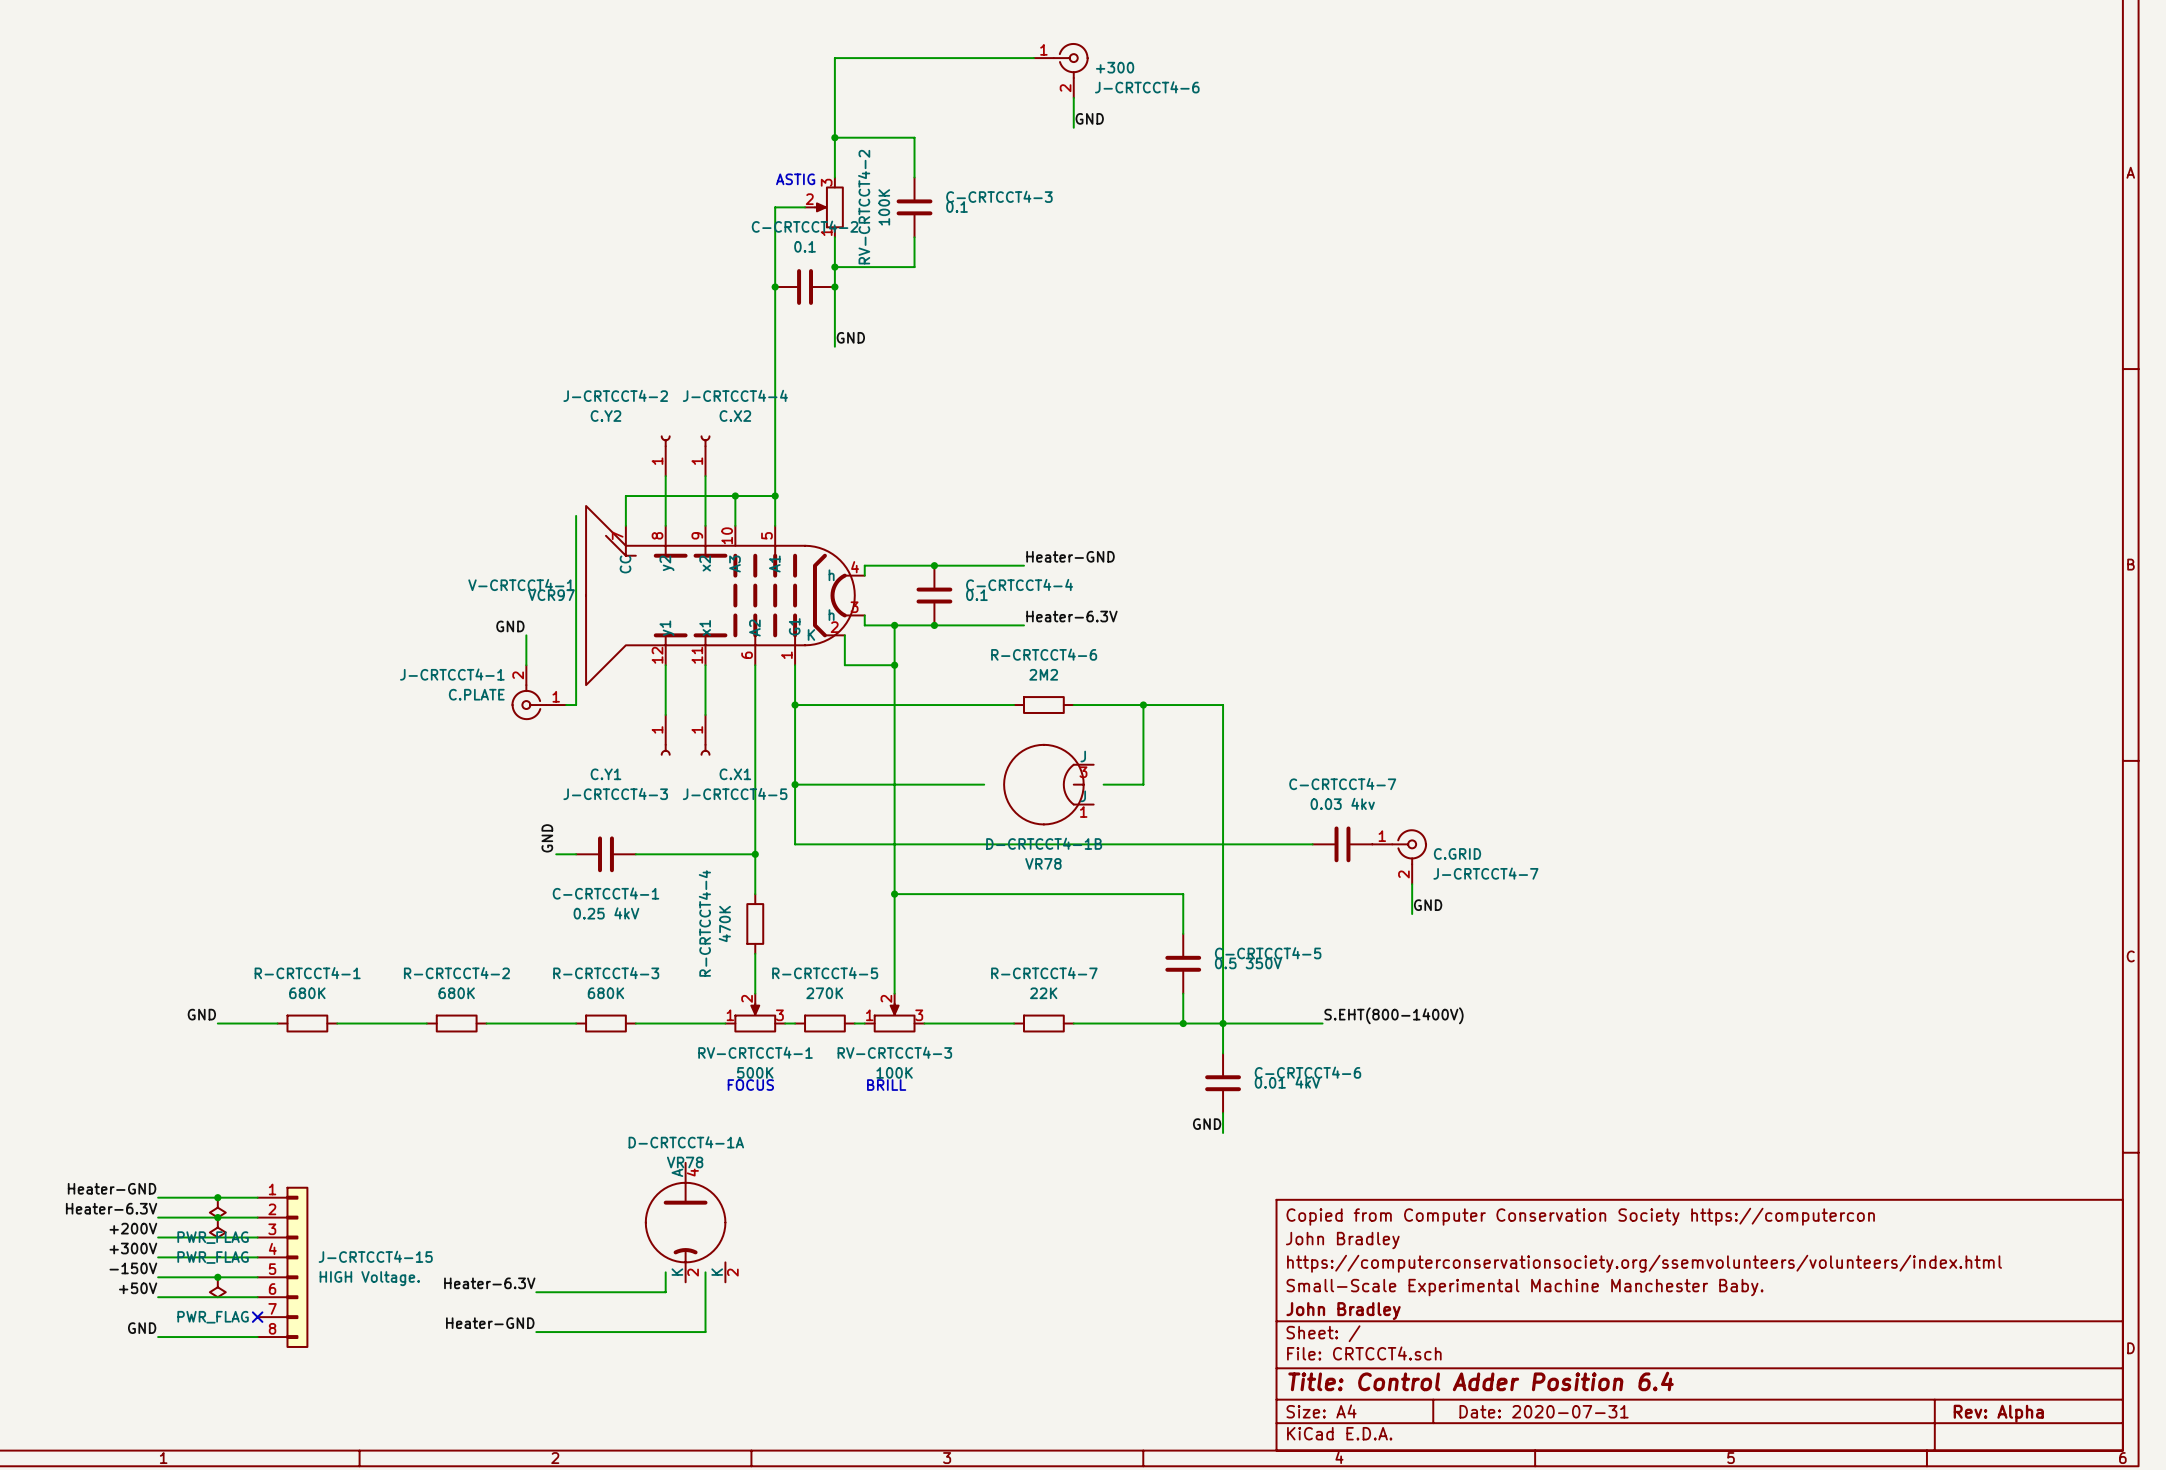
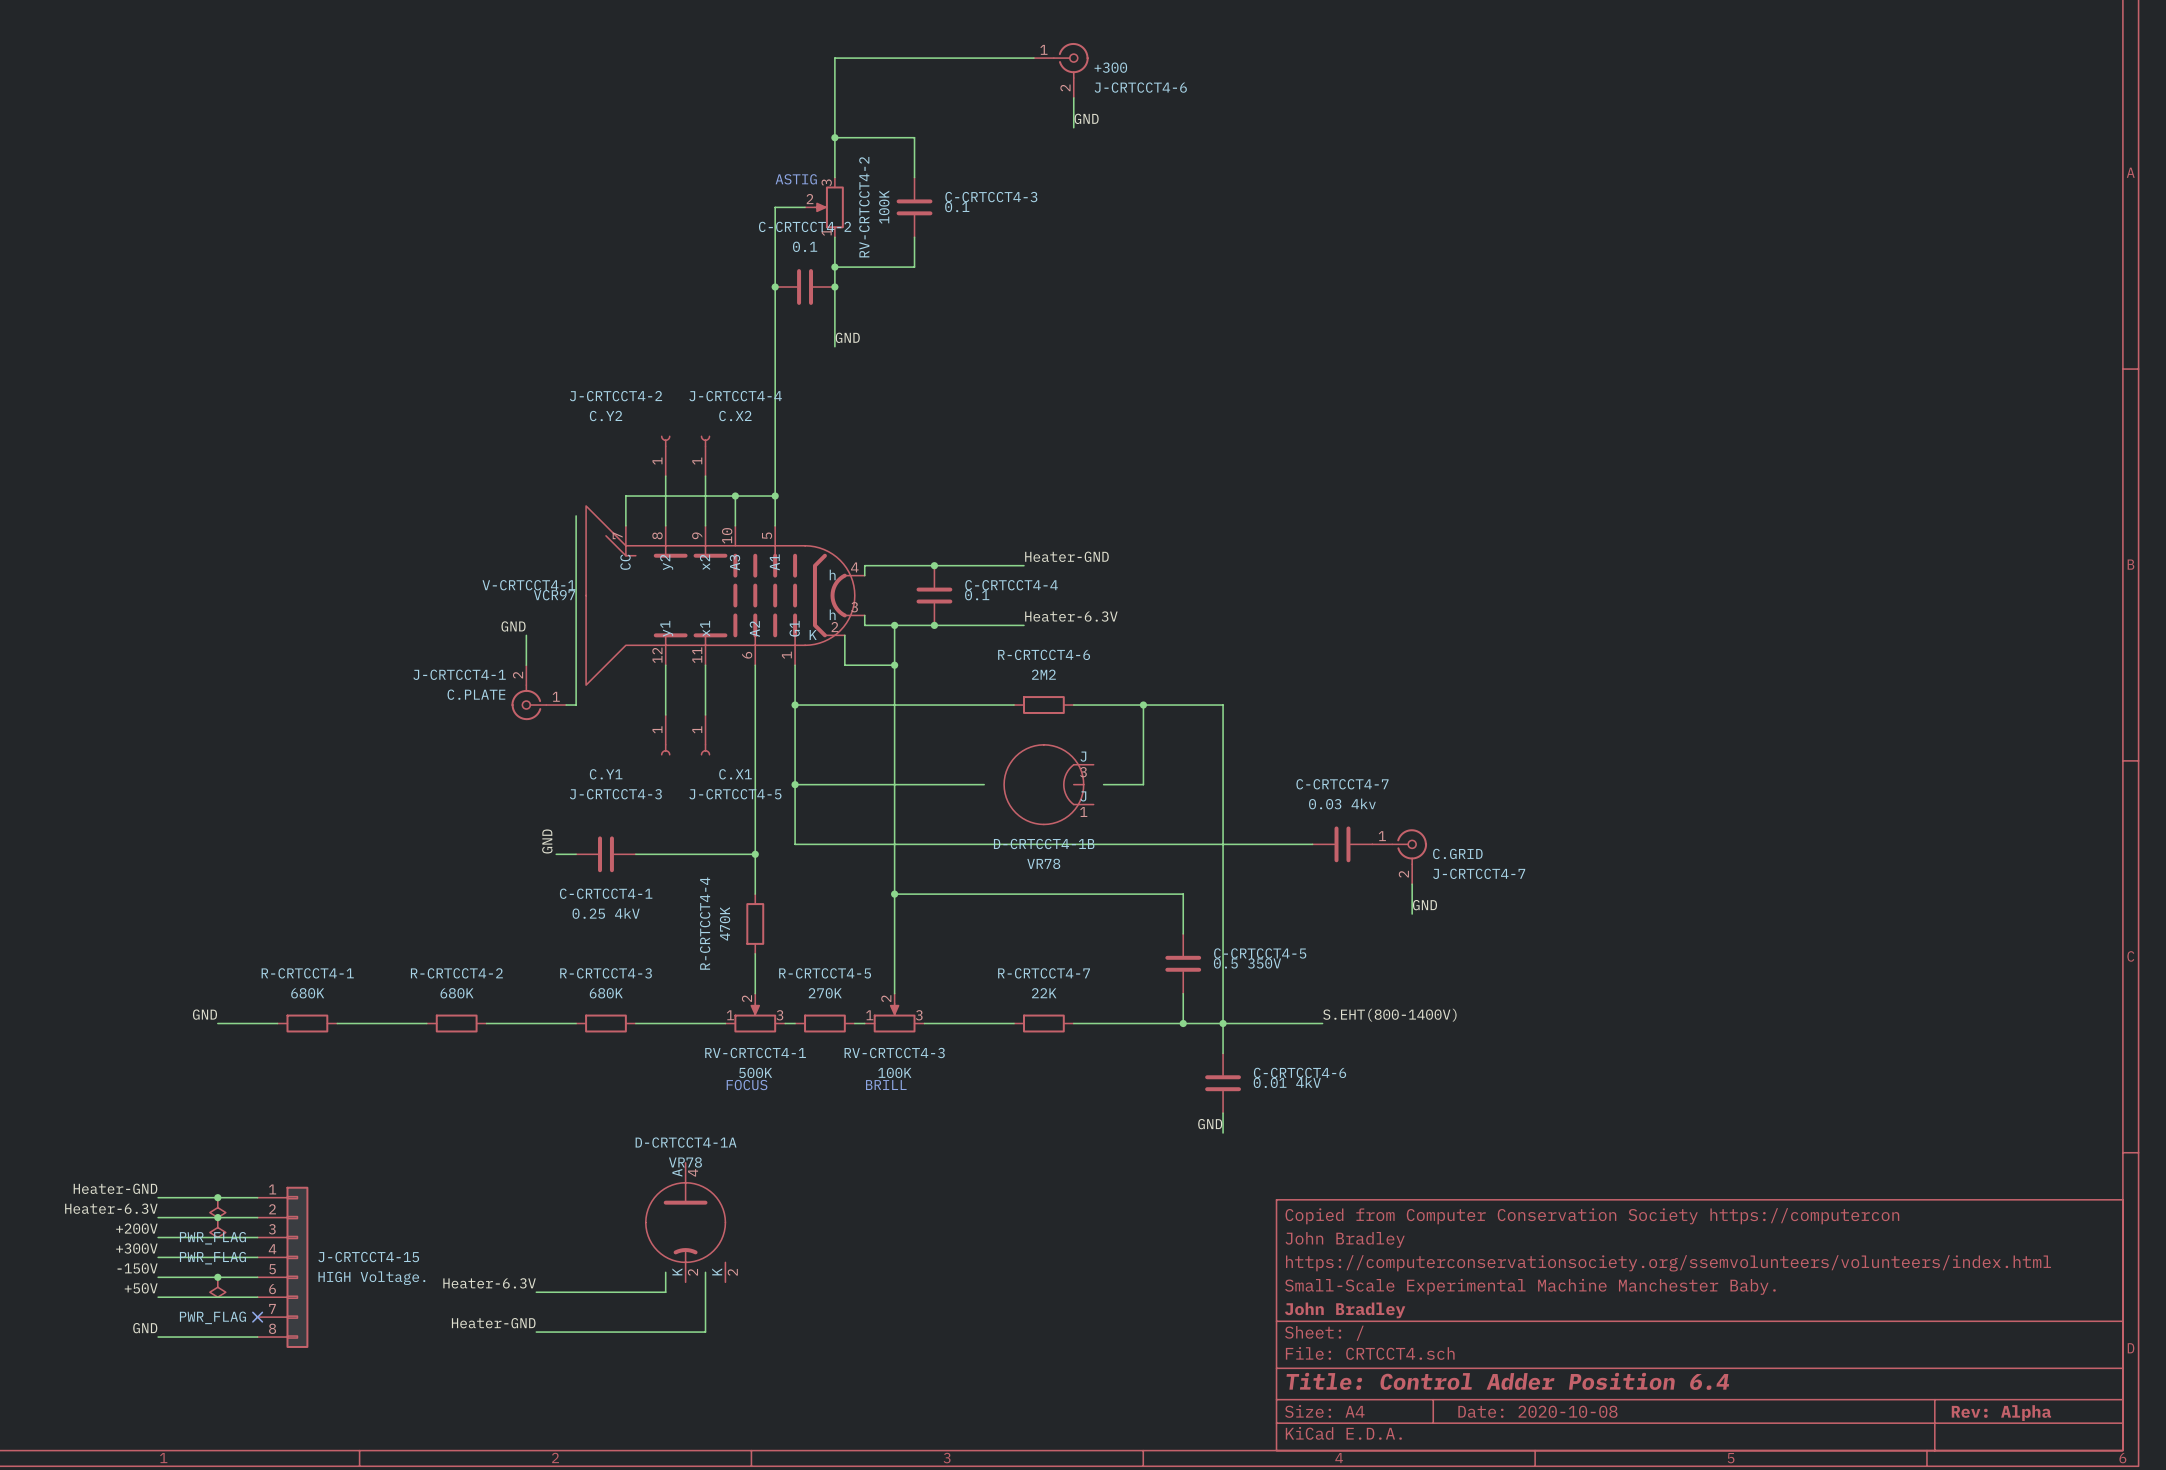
title block: Date: 2020-07-31 (1544, 1411) -> Date: 2020-10-08 (1537, 1411)

